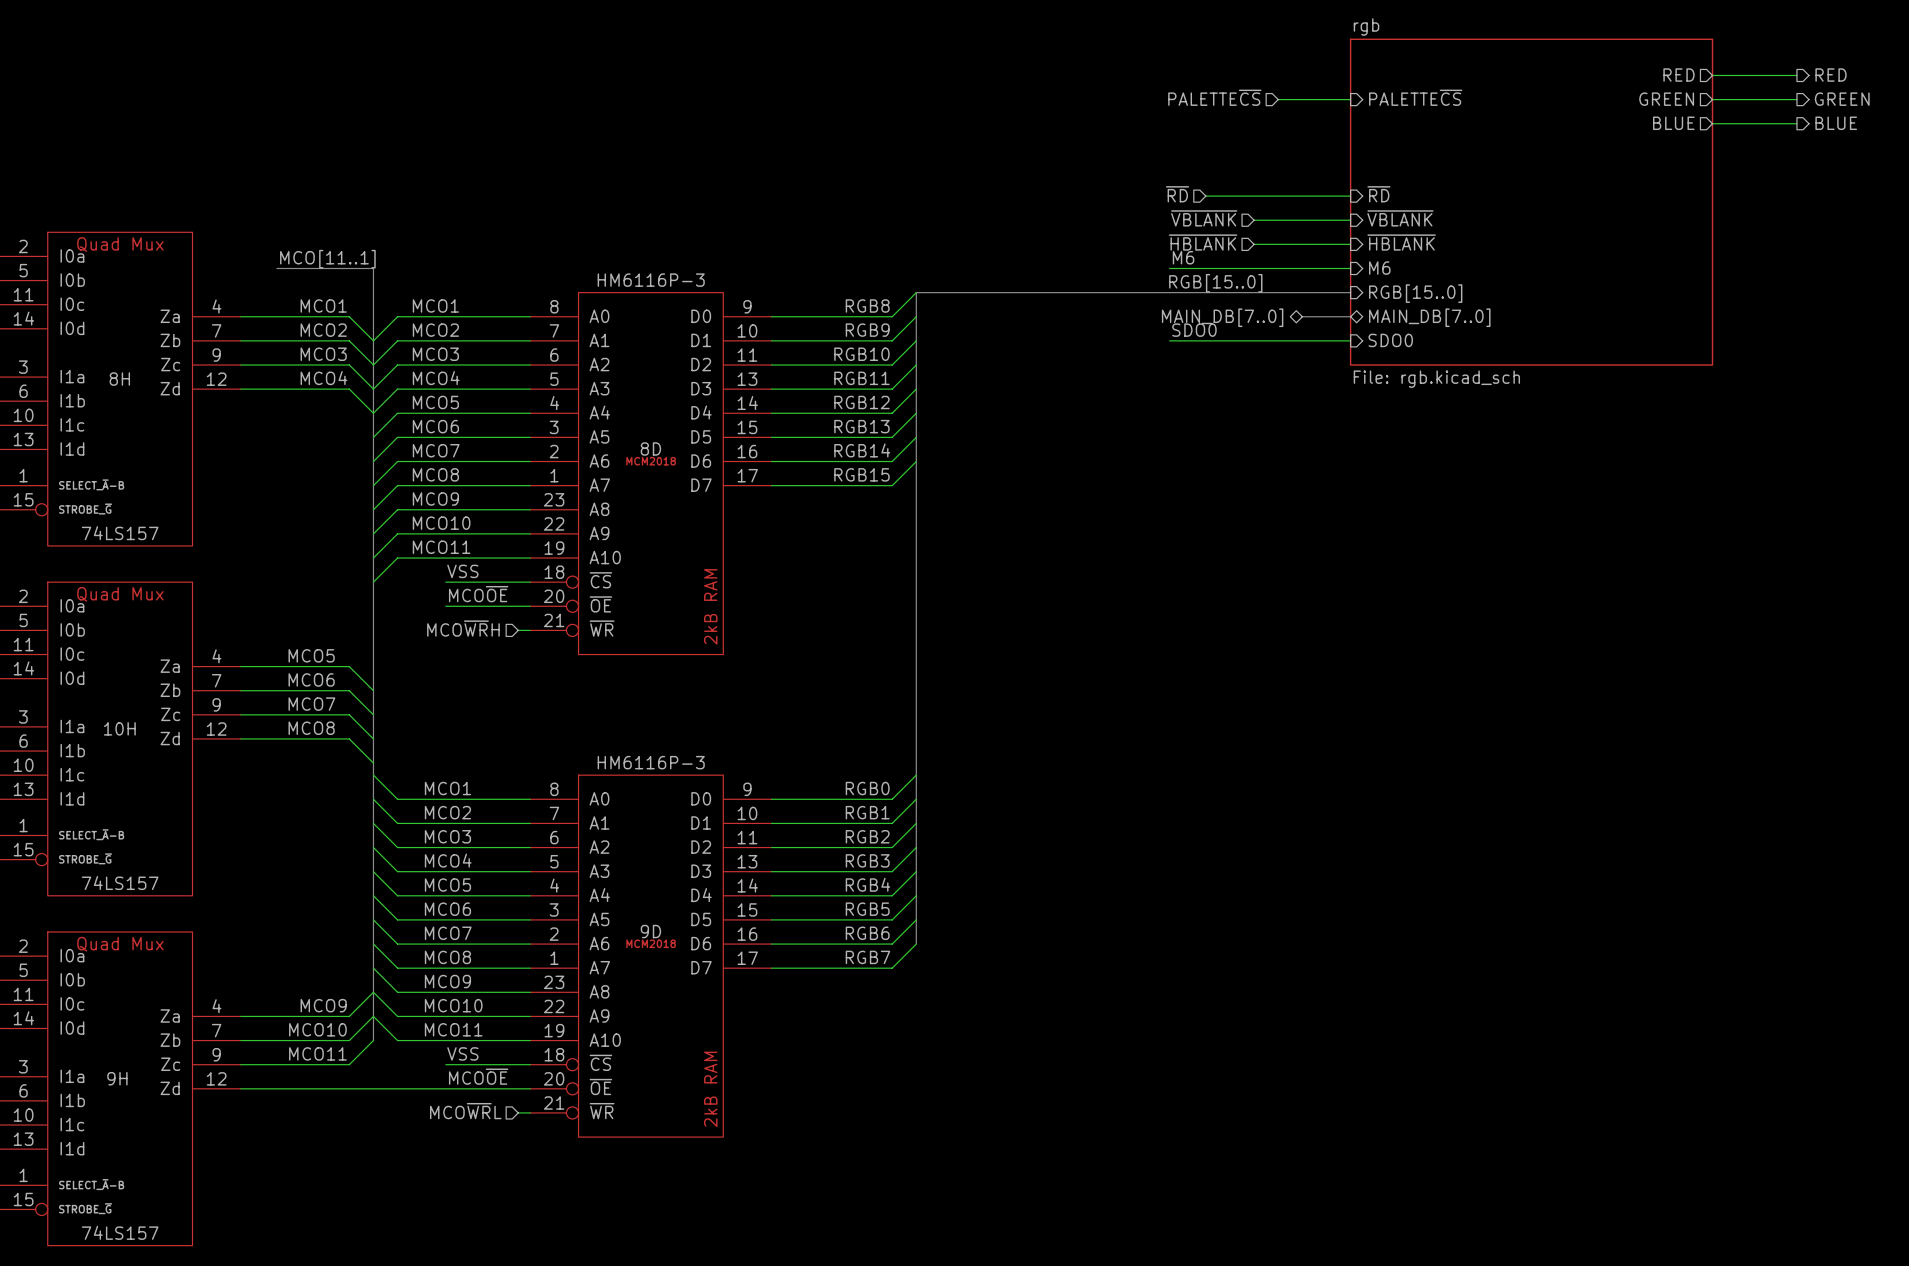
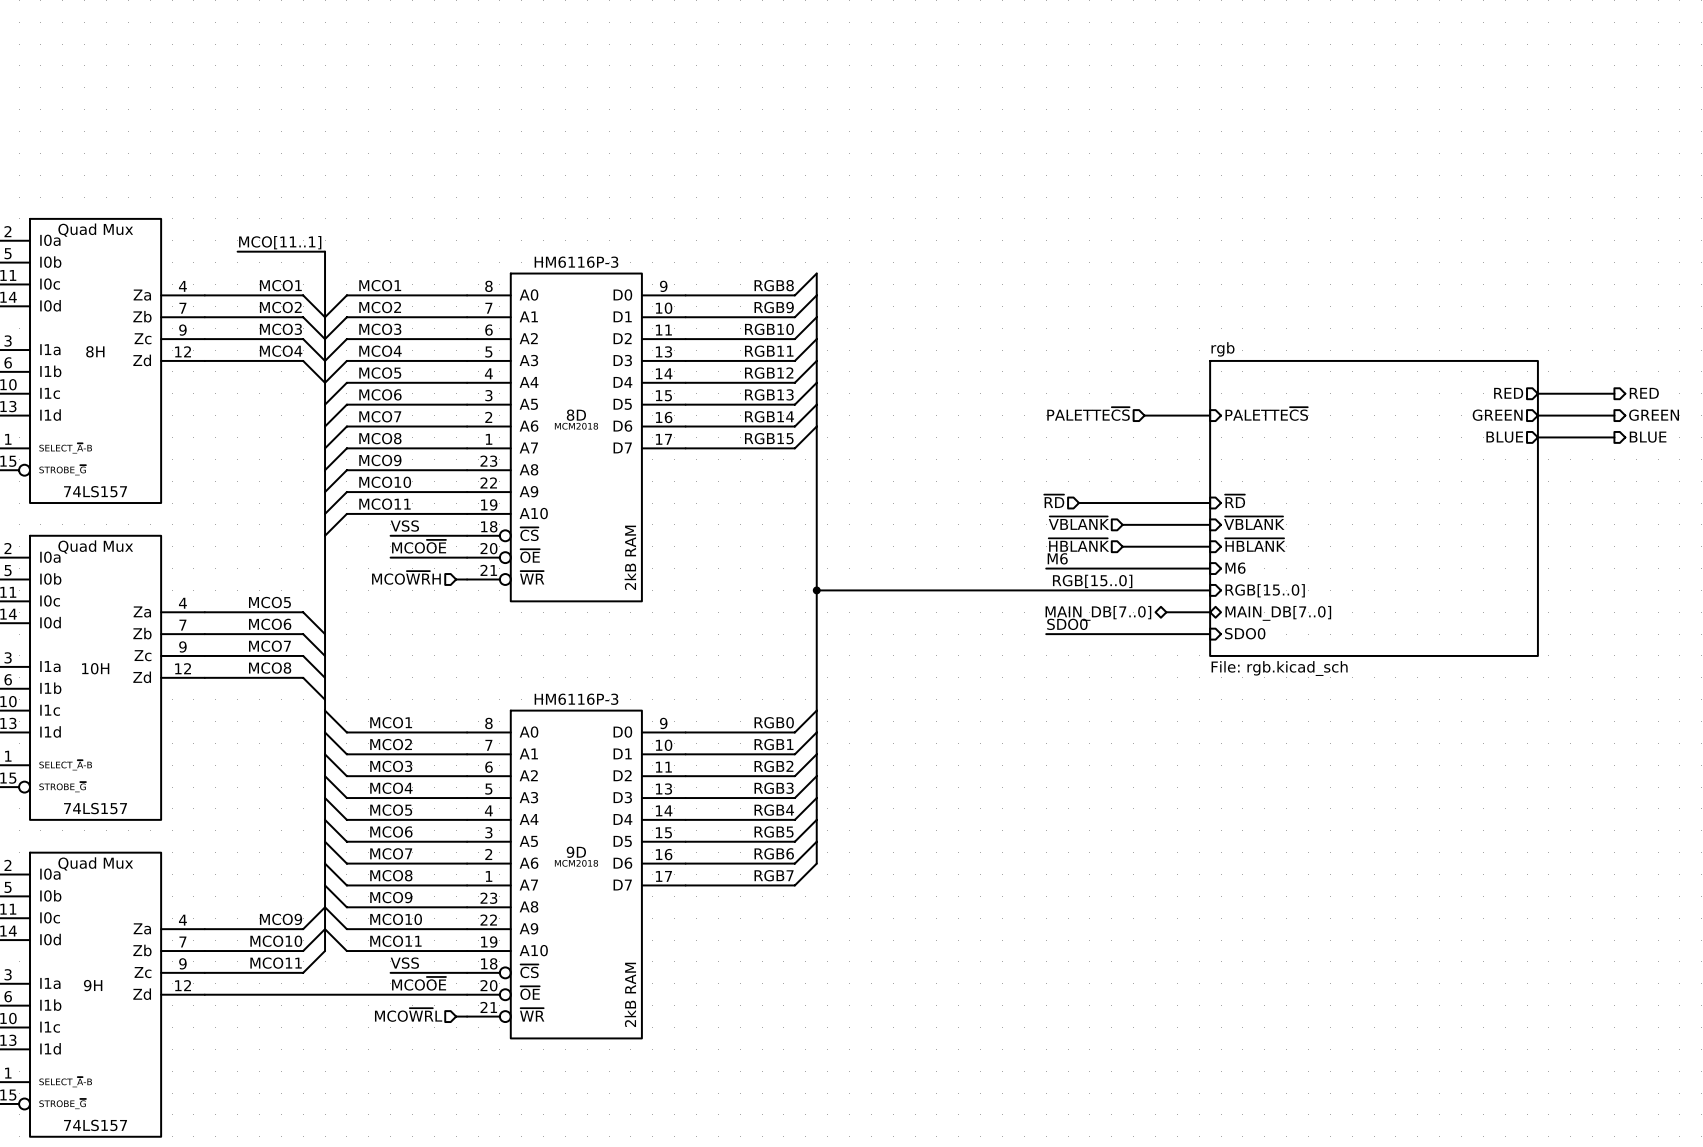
sheet pin: RED (1679, 75) -> none
wire: (1712, 75) (1796, 75) -> none
hierarchical label: RED (1831, 75) -> none
hierarchical label: PALETTE~{CS} (1214, 97) -> none
sheet pin: PALETTE~{CS} (1415, 97) -> none
wire: (1278, 99) (1350, 99) -> none
sheet pin: GREEN (1666, 99) -> none
wire: (1712, 99) (1796, 99) -> none
hierarchical label: GREEN (1842, 99) -> none
sheet pin: BLUE (1673, 123) -> none
wire: (1712, 123) (1796, 123) -> none
hierarchical label: BLUE (1836, 123) -> none
hierarchical label: ~{RD} (1177, 194) -> none
sheet pin: ~{RD} (1378, 194) -> none
wire: (1205, 196) (1350, 196) -> none
sheet rgb: File: rgb.kicad_sch (1531, 202) -> none
hierarchical label: ~{VBLANK} (1204, 218) -> none
sheet pin: ~{VBLANK} (1400, 218) -> none
wire: (1254, 220) (1350, 220) -> none
hierarchical label: ~{HBLANK} (1203, 242) -> none
sheet pin: ~{HBLANK} (1401, 242) -> none
wire: (1254, 244) (1350, 244) -> none
label: M6 (1183, 257) -> none
wire: (1169, 268) (1350, 268) -> none
sheet pin: M6 (1379, 268) -> none
label: RGB[15..0] (1215, 283) -> none
bus: (916, 292) (1350, 292) -> none
sheet pin: RGB[15..0] (1415, 293) -> none
bus: (1302, 316) (1350, 316) -> none
hierarchical label: MAIN_DB[7..0] (1222, 317) -> none
sheet pin: MAIN_DB[7..0] (1429, 317) -> none
label: SDO0 (1194, 330) -> none
wire: (1169, 340) (1350, 340) -> none
sheet pin: SDO0 (1390, 340) -> none
sheet pin: none -> RED (1508, 393)
hierarchical label: none -> RED (1644, 393)
wire: none -> (1537, 393) (1614, 393)
hierarchical label: none -> PALETTE~{CS} (1088, 414)
sheet pin: none -> PALETTE~{CS} (1266, 414)
wire: none -> (1144, 415) (1210, 415)
sheet pin: none -> GREEN (1497, 415)
wire: none -> (1537, 415) (1614, 415)
hierarchical label: none -> GREEN (1654, 415)
sheet pin: none -> BLUE (1504, 437)
wire: none -> (1537, 437) (1614, 437)
hierarchical label: none -> BLUE (1648, 437)
hierarchical label: none -> ~{RD} (1054, 501)
sheet pin: none -> ~{RD} (1235, 501)
wire: none -> (1078, 503) (1210, 503)
sheet rgb: none -> File: rgb.kicad_sch (1374, 508)
hierarchical label: none -> ~{VBLANK} (1078, 523)
sheet pin: none -> ~{VBLANK} (1254, 523)
wire: none -> (1122, 524) (1210, 524)
hierarchical label: none -> ~{HBLANK} (1078, 545)
sheet pin: none -> ~{HBLANK} (1255, 545)
wire: none -> (1122, 546) (1210, 546)
label: none -> M6 (1057, 558)
sheet pin: none -> M6 (1235, 568)
wire: none -> (1046, 568) (1210, 568)
label: none -> RGB[15..0] (1092, 581)
bus: none -> (816, 590) (1210, 590)
junction: none -> (816, 590)
sheet pin: none -> RGB[15..0] (1265, 590)
bus: none -> (1166, 612) (1210, 612)
hierarchical label: none -> MAIN_DB[7..0] (1098, 613)
sheet pin: none -> MAIN_DB[7..0] (1278, 613)
label: none -> SDO0 (1067, 624)
wire: none -> (1046, 634) (1210, 634)
sheet pin: none -> SDO0 (1245, 633)

